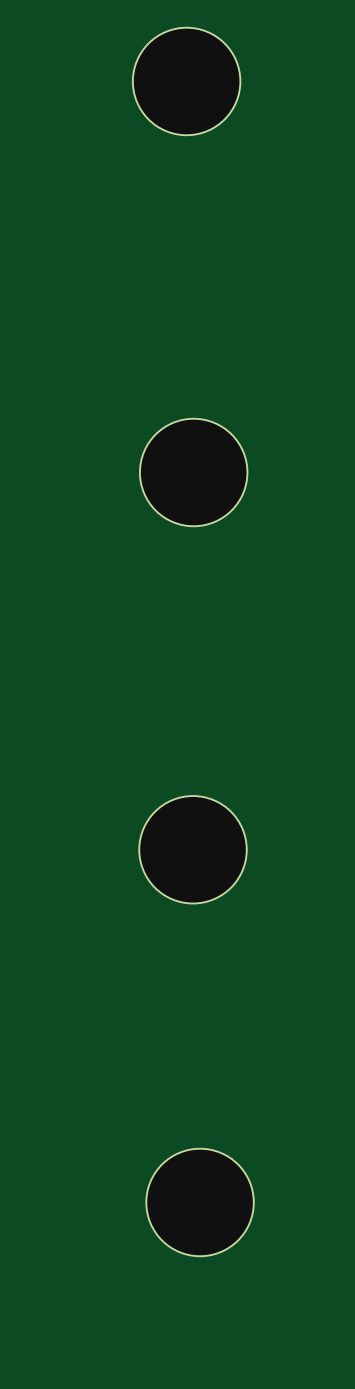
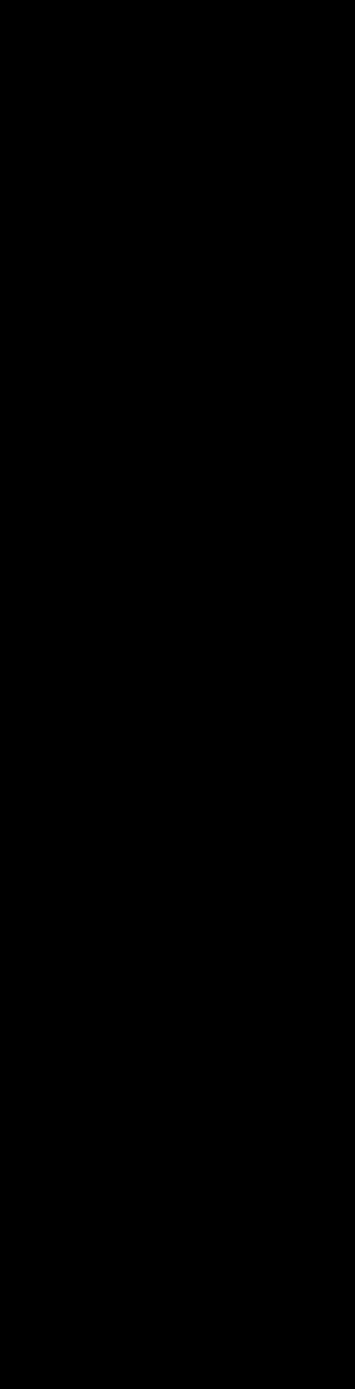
part: (186, 81) -> none
part: (193, 472) -> none
part: (193, 849) -> none
part: (200, 1202) -> none

